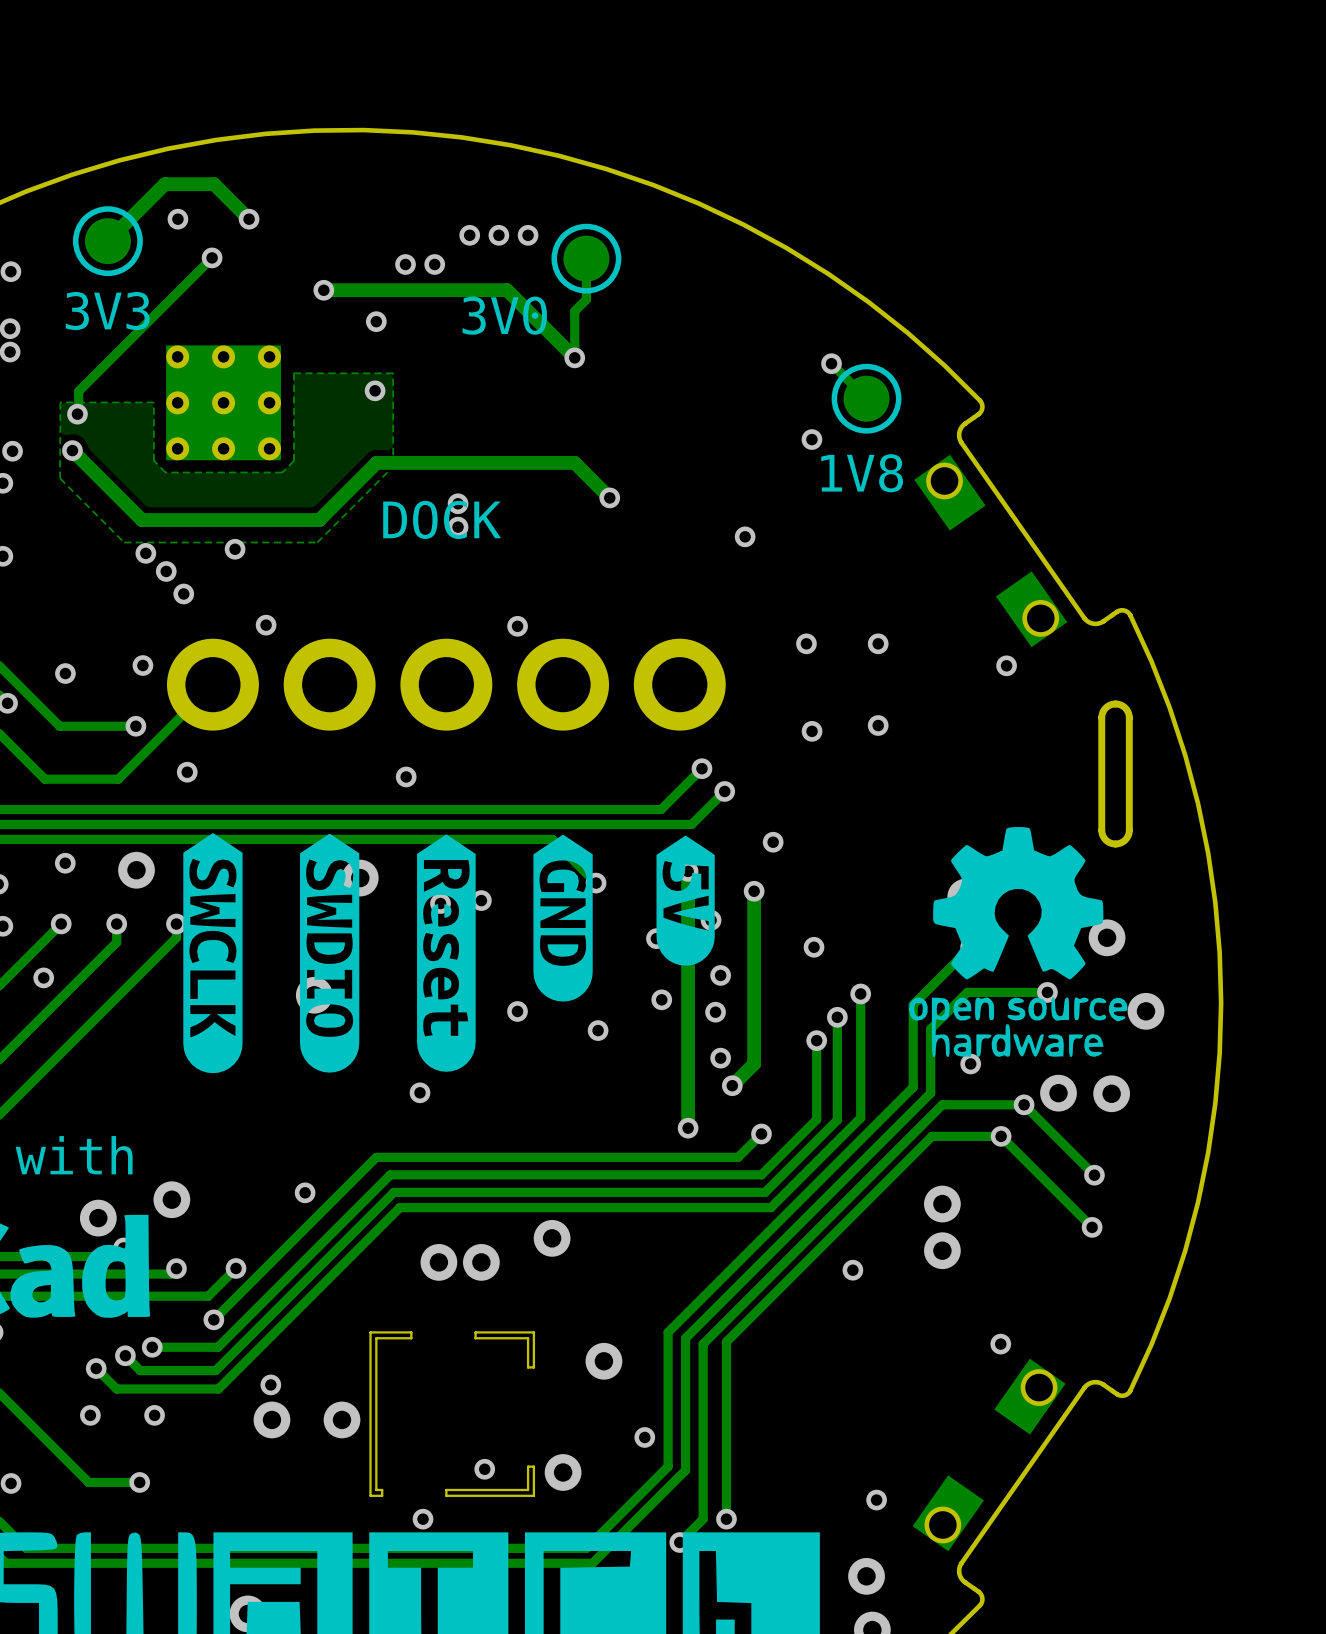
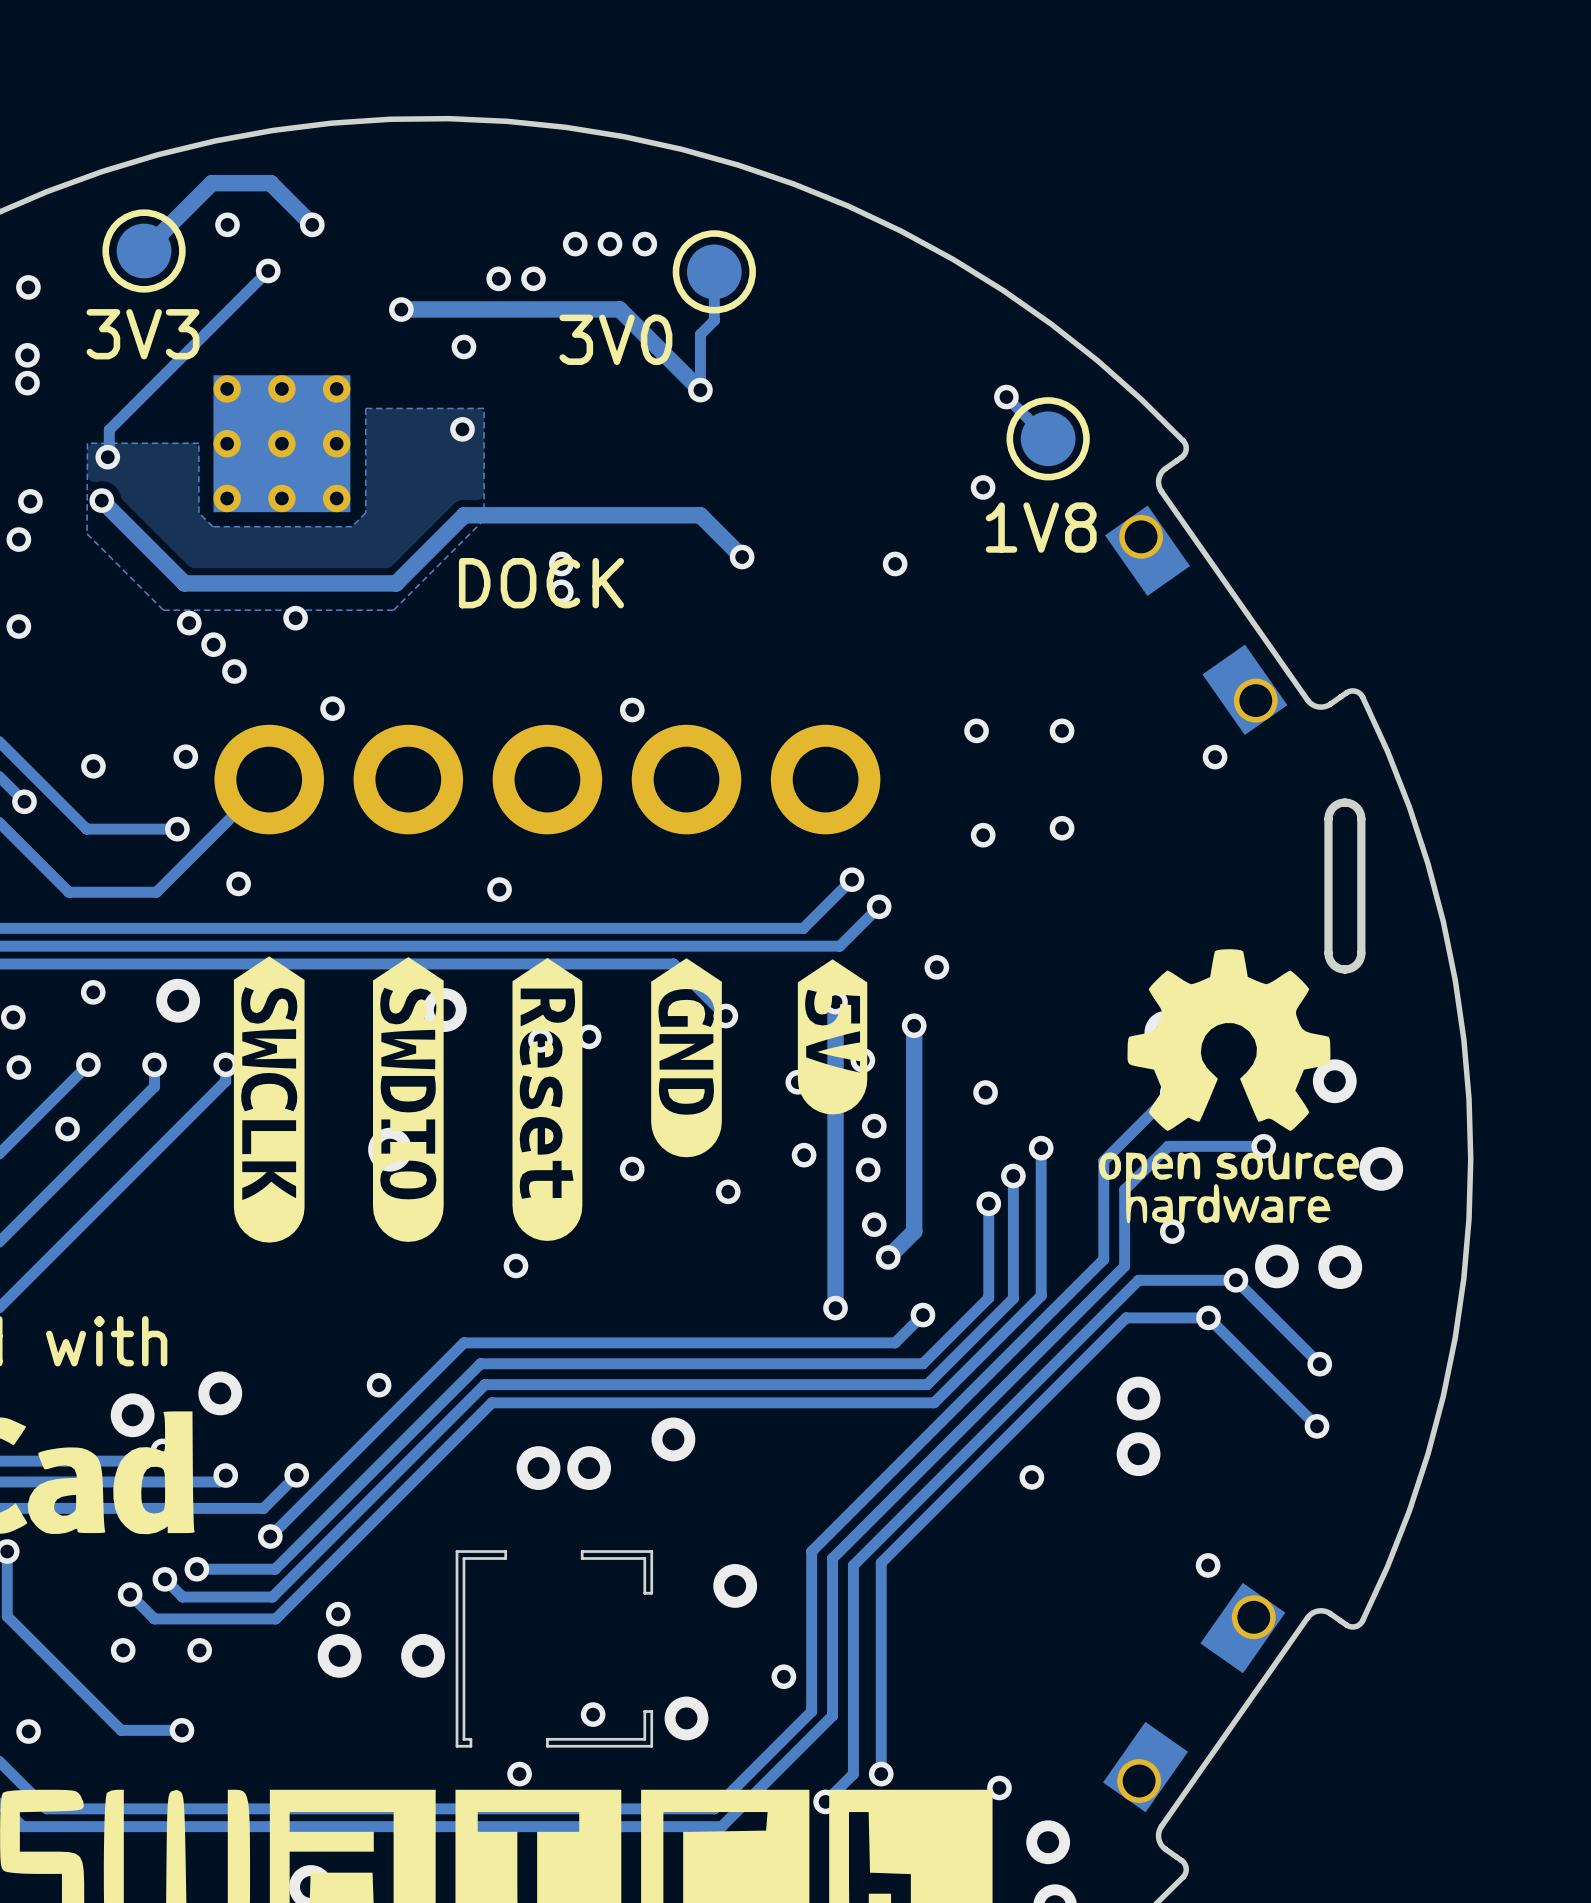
via position: (745, 536) -> (895, 563)
via position: (876, 1500) -> (999, 1787)

